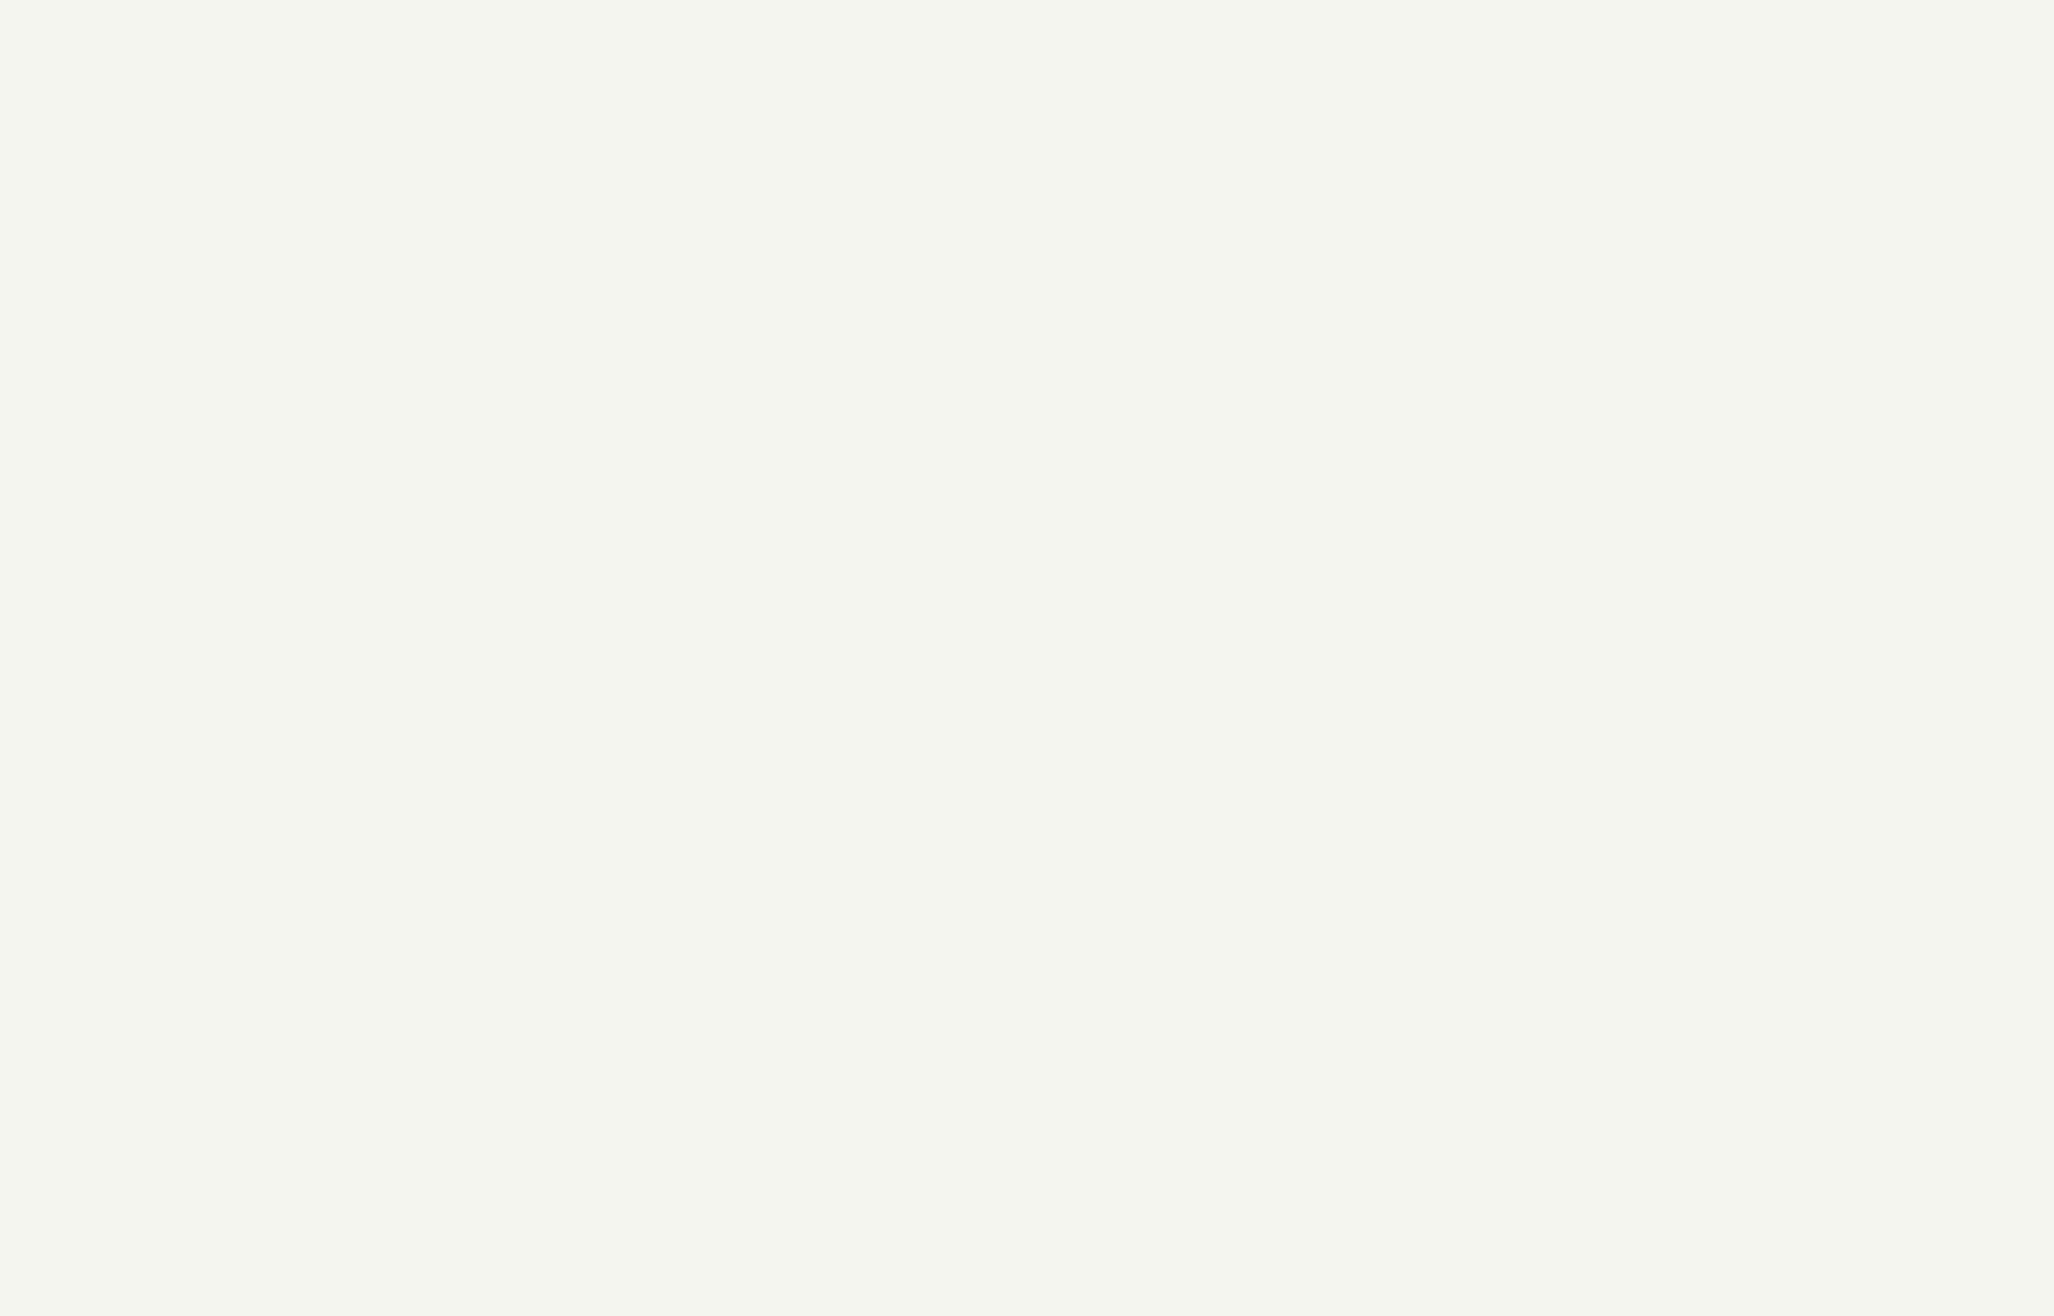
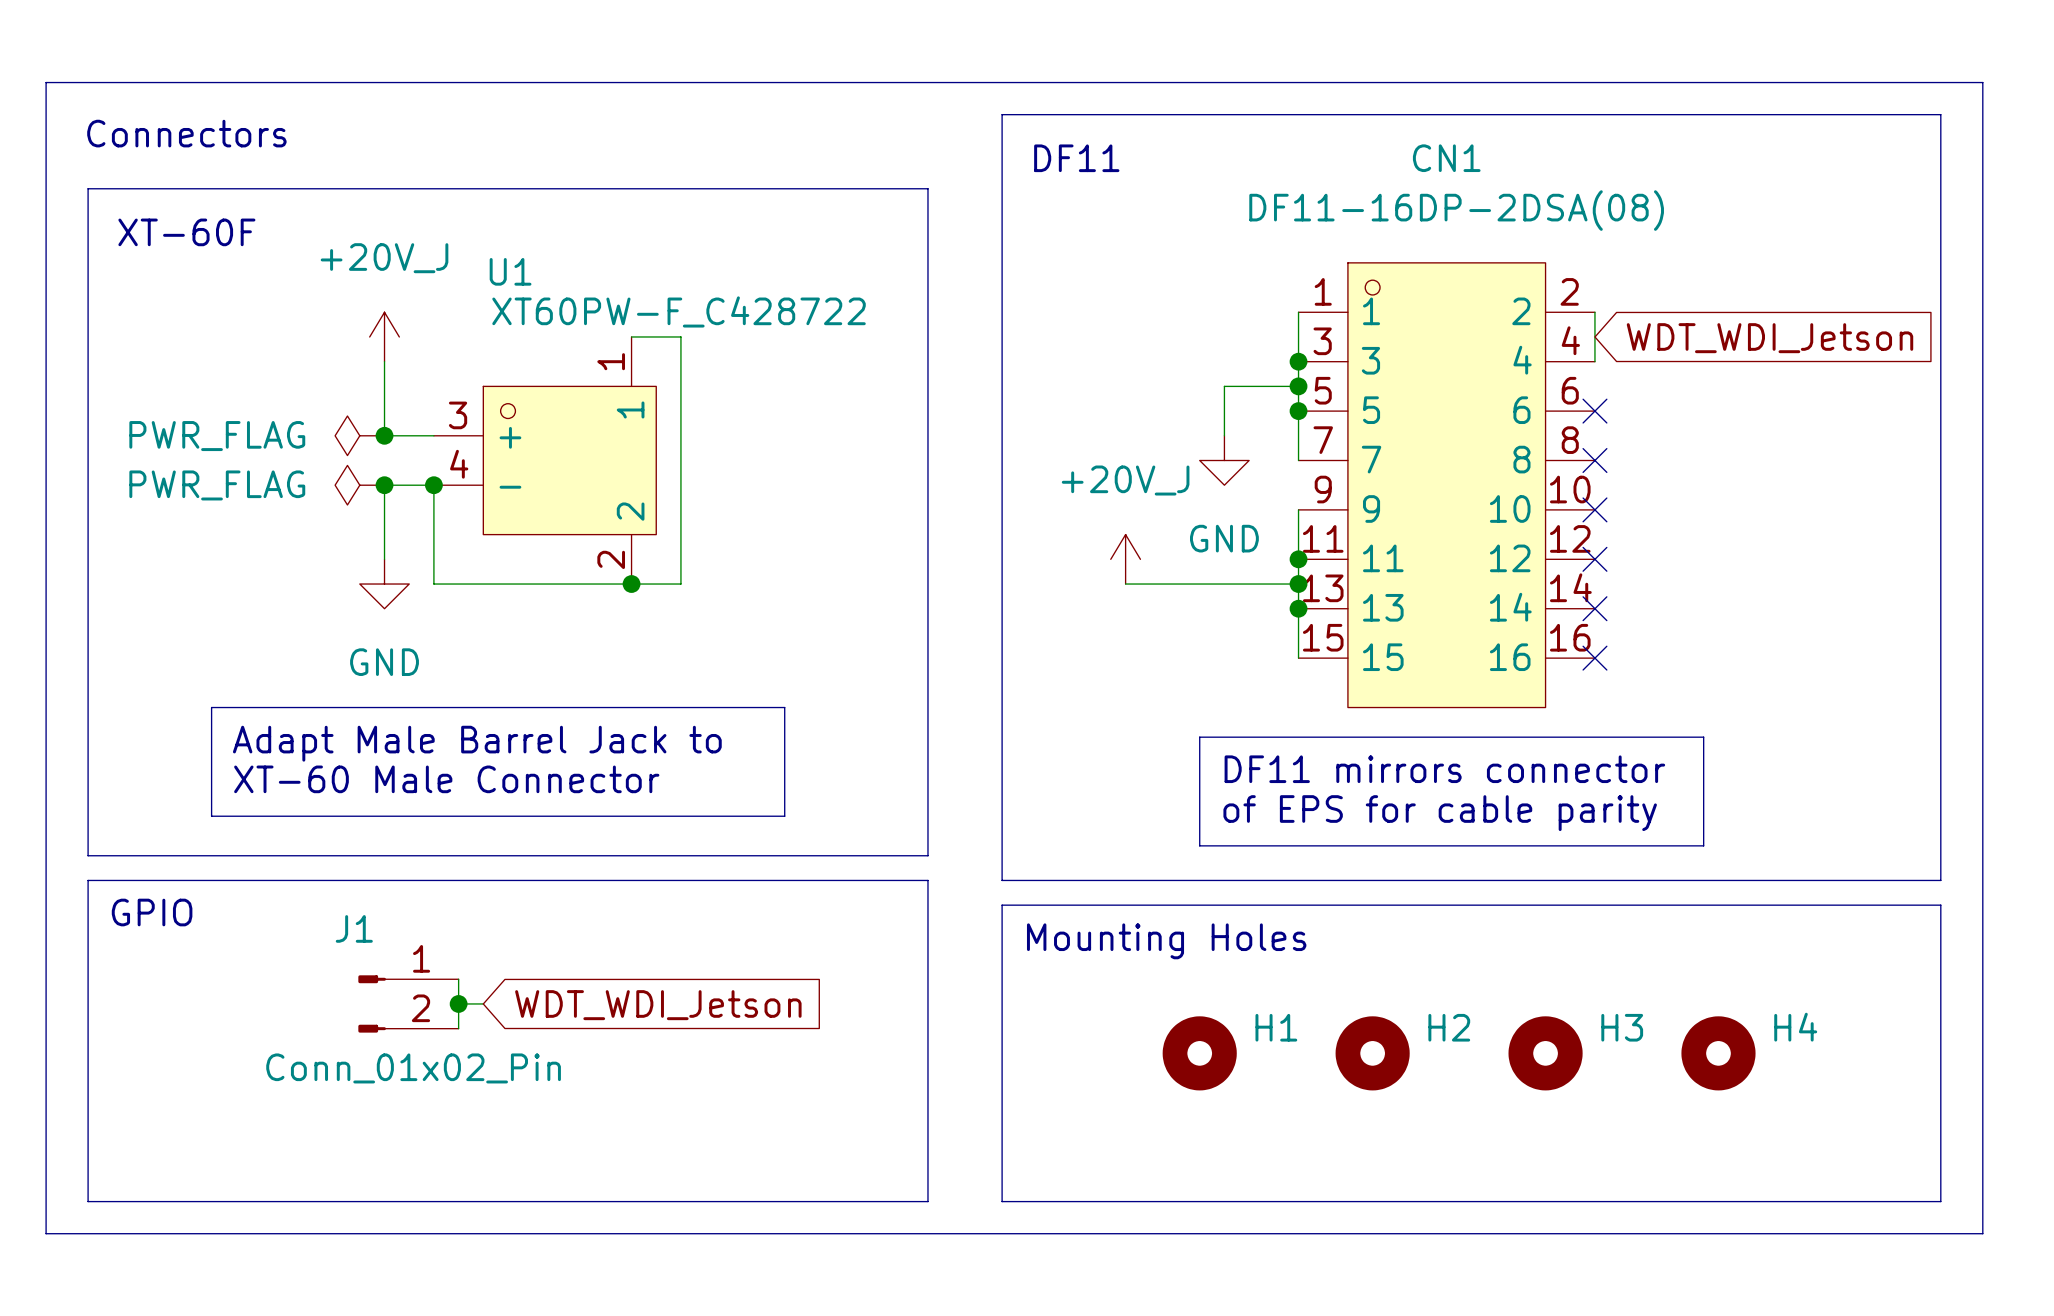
line: none -> (46, 82) (1982, 82) (1982, 1233) (46, 1233) (46, 82)
line: none -> (1002, 114) (1940, 114) (1940, 880) (1002, 880) (1002, 114)
text: none -> Connectors (186, 133)
text: none -> DF11 (1076, 158)
line: none -> (88, 188) (927, 188) (927, 855) (88, 855) (88, 188)
text: none -> XT-60F (186, 232)
wire: none -> (1298, 312) (1298, 460)
wire: none -> (1594, 312) (1594, 361)
power symbol: none -> +20V_J (384, 336)
wire: none -> (631, 336) (680, 336) (680, 584) (433, 584) (433, 485) (384, 485) (384, 559)
global label: none -> WDT_WDI_Jetson (1769, 338)
wire: none -> (384, 361) (384, 435) (433, 435)
junction: none -> (1298, 361)
wire: none -> (1298, 386) (1224, 386) (1224, 435)
junction: none -> (1298, 386)
junction: none -> (1298, 411)
no-connect mark: none -> (1594, 411)
power symbol: none -> PWR_FLAG (359, 435)
junction: none -> (384, 435)
U1: none -> XT60PW-F_C428722 (545, 460)
power symbol: none -> GND (1224, 460)
no-connect mark: none -> (1594, 460)
power symbol: none -> PWR_FLAG (359, 485)
junction: none -> (384, 485)
junction: none -> (433, 485)
CN1: none -> DF11-16DP-2DSA(08) (1446, 485)
wire: none -> (1298, 509) (1298, 658)
no-connect mark: none -> (1594, 509)
power symbol: none -> +20V_J (1125, 559)
junction: none -> (1298, 559)
no-connect mark: none -> (1594, 559)
power symbol: none -> GND (384, 584)
junction: none -> (631, 584)
wire: none -> (1125, 584) (1298, 584)
junction: none -> (1298, 584)
junction: none -> (1298, 608)
no-connect mark: none -> (1594, 608)
no-connect mark: none -> (1594, 658)
line: none -> (211, 707) (784, 707) (784, 816) (211, 816) (211, 707)
line: none -> (1199, 737) (1703, 737) (1703, 845) (1199, 845) (1199, 737)
text: none -> Adapt Male Barrel Jack to (477, 743)
text: none -> DF11 mirrors connector (1444, 769)
text: none -> XT-60 Male Connector (446, 779)
text: none -> of EPS for cable parity (1440, 813)
line: none -> (88, 880) (88, 1201) (927, 1201) (927, 880) (88, 880)
line: none -> (1002, 905) (1002, 1201) (1940, 1201) (1940, 905) (1002, 905)
text: none -> GPIO (152, 912)
text: none -> Mounting Holes (1166, 941)
wire: none -> (458, 979) (458, 1028)
J1: none -> Conn_01x02_Pin (408, 1003)
wire: none -> (458, 1003) (483, 1003)
junction: none -> (458, 1003)
global label: none -> WDT_WDI_Jetson (658, 1005)
H1: none -> (1199, 1053)
H2: none -> (1372, 1053)
H3: none -> (1545, 1053)
H4: none -> (1718, 1053)

